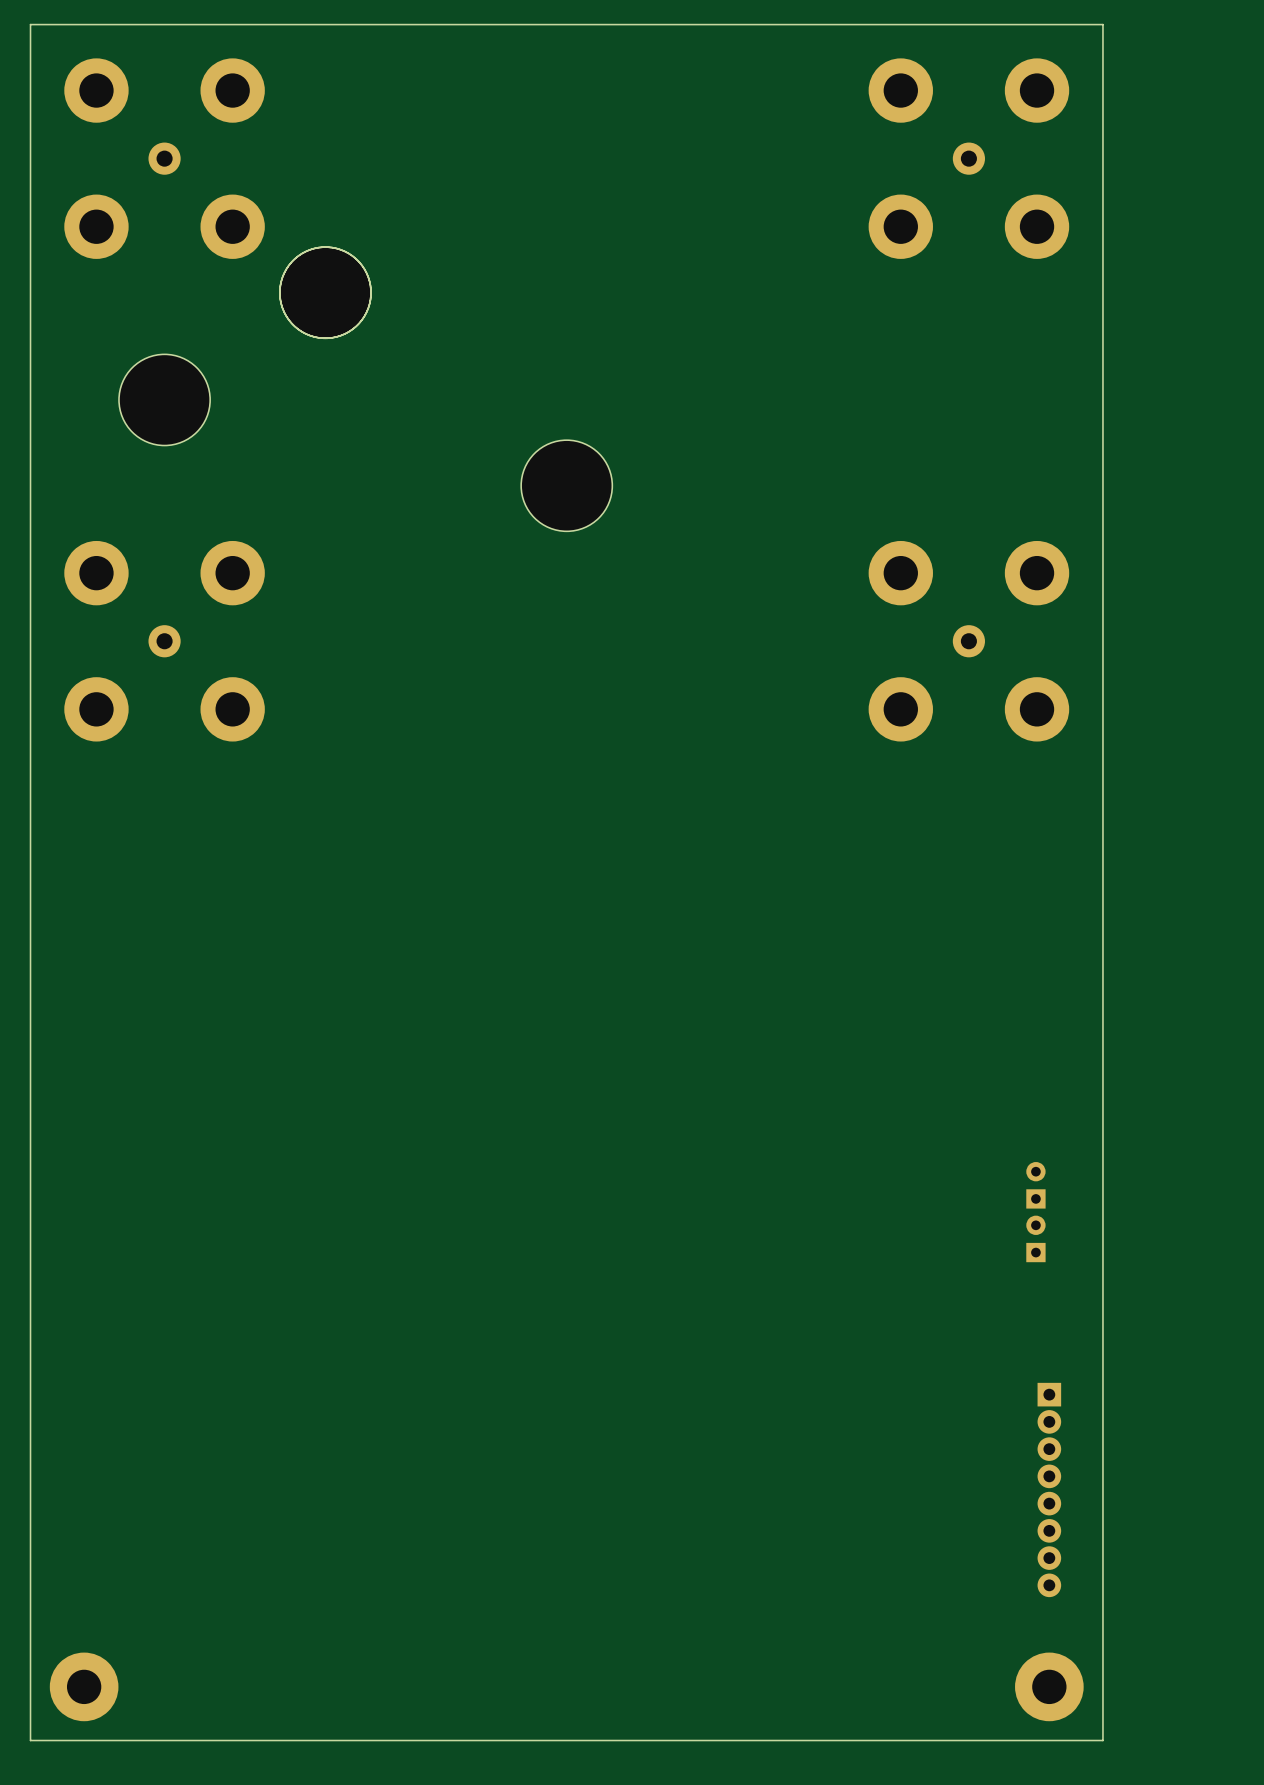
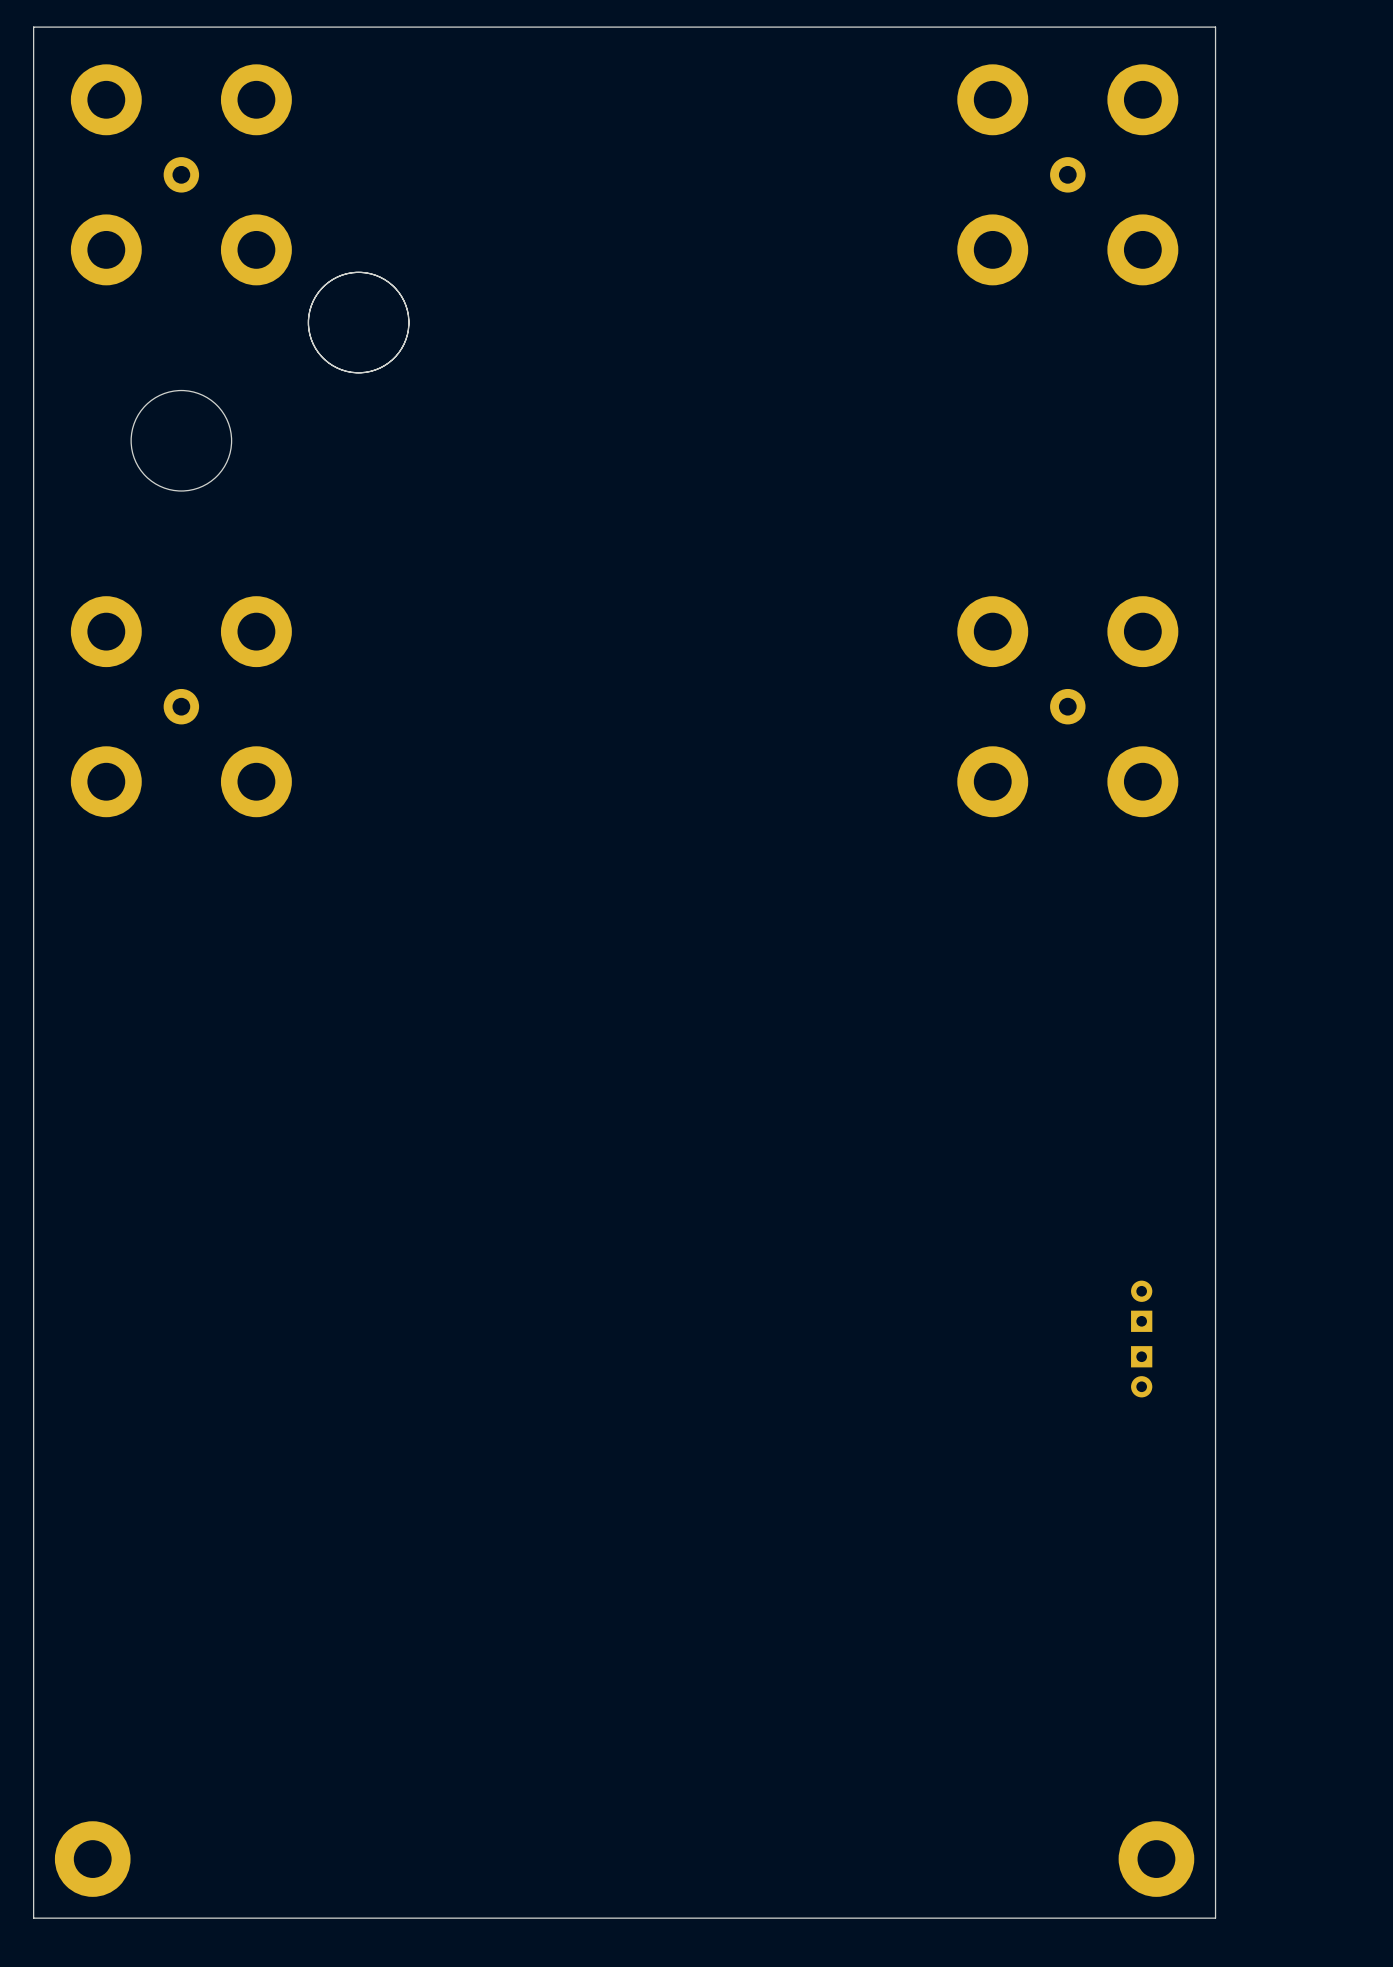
part: (566, 485) -> none
part rotation: 0° (1035, 1238) -> 180° (1141, 1371)
part: (1049, 1489) -> none

